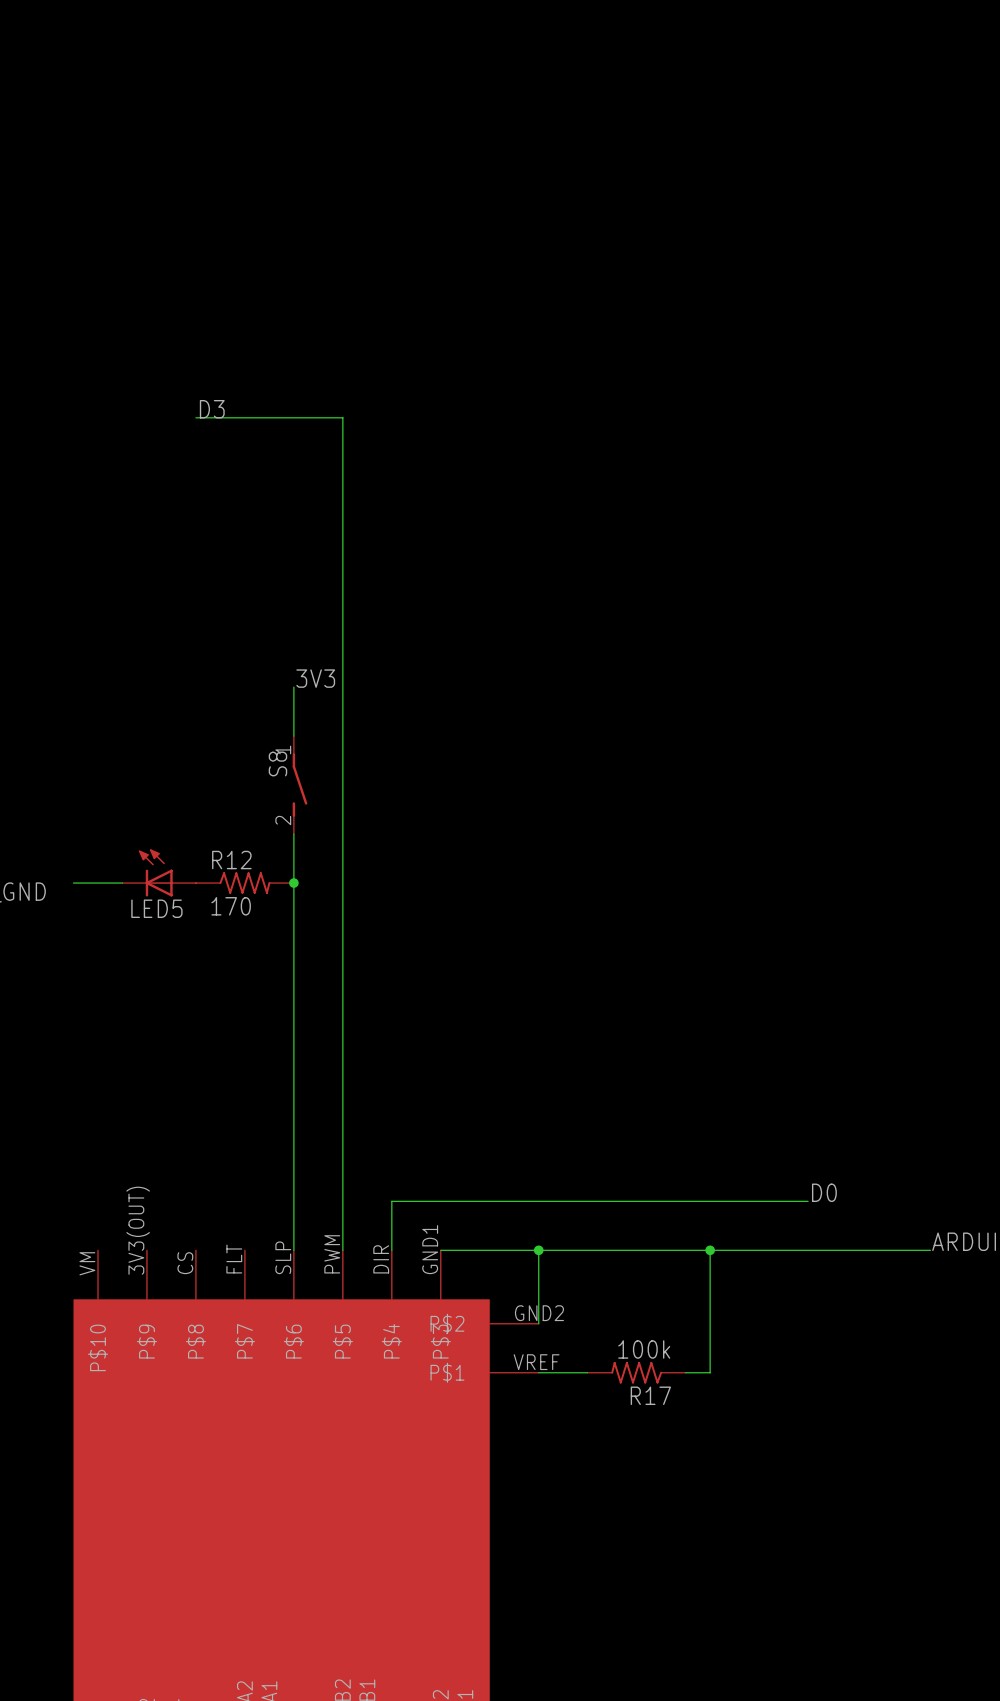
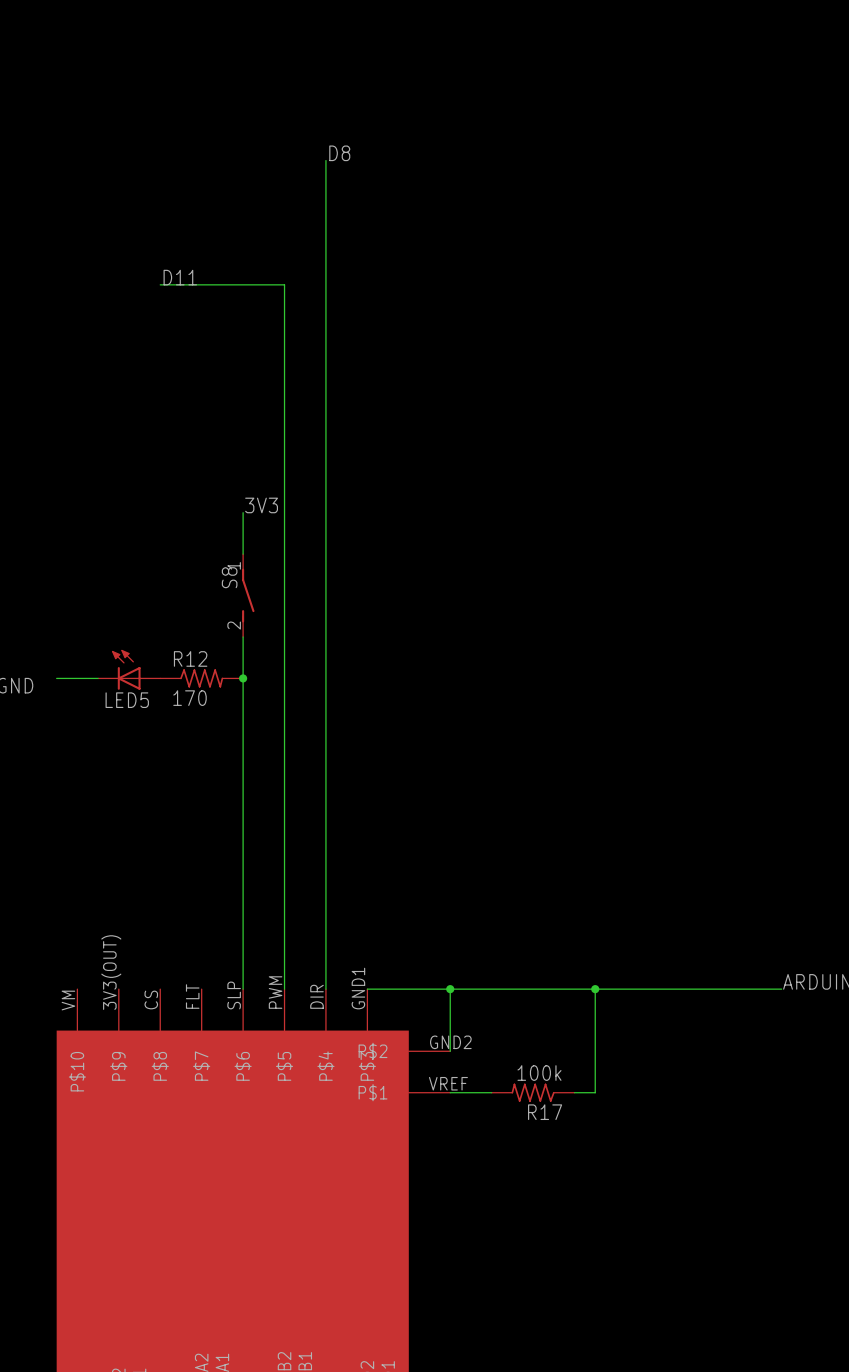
label: none -> D8 (339, 153)
label: D3 (212, 409) -> D11 (180, 277)
label: D0 (824, 1192) -> none
wire: (391, 1201) (808, 1201) -> (325, 947) (325, 160)

